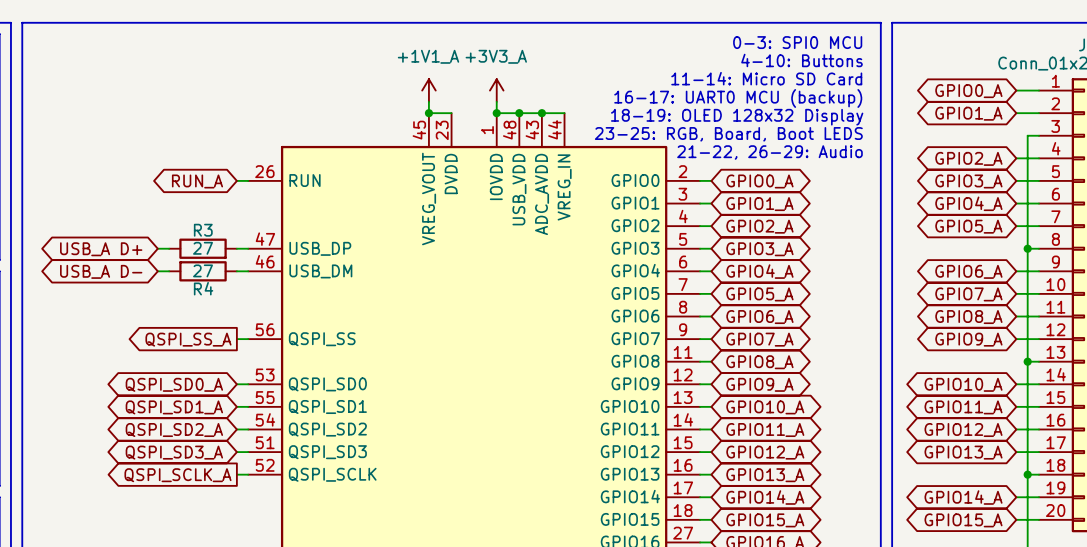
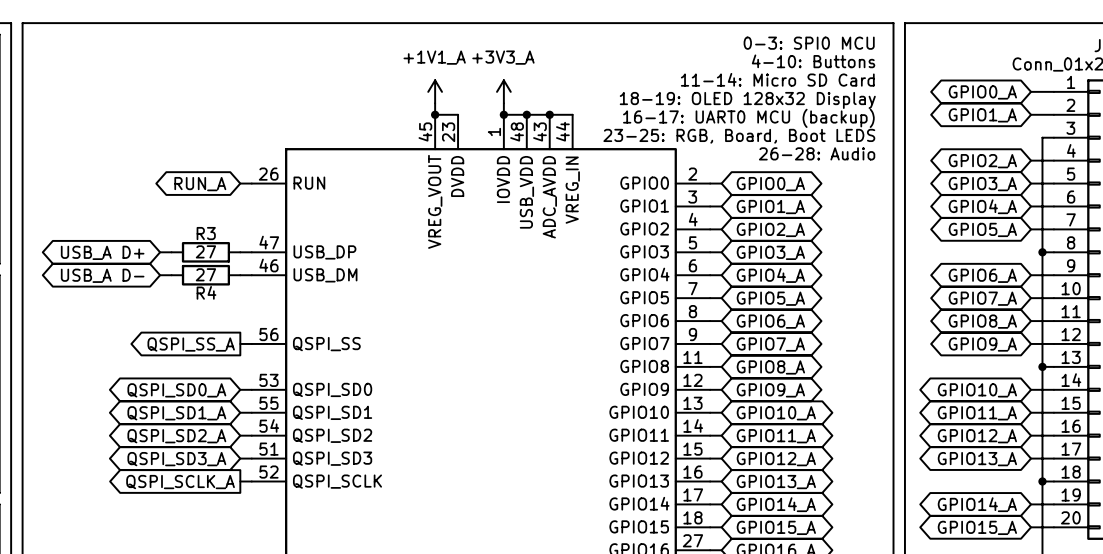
text: 16-17: UART0 MCU (backup) (738, 98) -> 18-19: OLED 128x32 Display (747, 100)
text: 18-19: OLED 128x32 Display (737, 117) -> 16-17: UART0 MCU (backup) (748, 118)
text: 21-22, 26-29: Audio (769, 152) -> 26-28: Audio (817, 153)

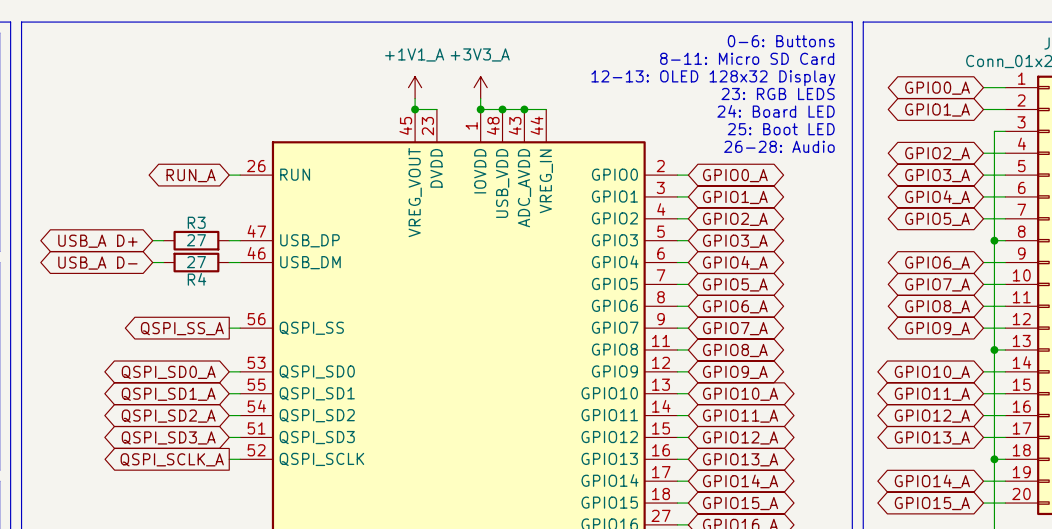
text: 0-3: SPI0 MCU (809, 43) -> 0-6: Buttons (781, 41)
text: 4-10: Buttons (813, 61) -> 8-11: Micro SD Card (747, 58)
text: 11-14: Micro SD Card (777, 79) -> 12-13: OLED 128x32 Display (713, 78)
text: 18-19: OLED 128x32 Display (747, 100) -> 23: RGB LEDS (778, 93)
text: 16-17: UART0 MCU (backup) (748, 118) -> 24: Board LED (776, 111)
text: 23-25: RGB, Board, Boot LEDS (739, 136) -> 25: Boot LED (781, 129)

